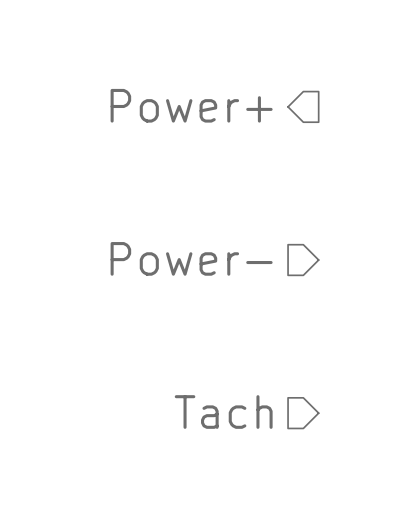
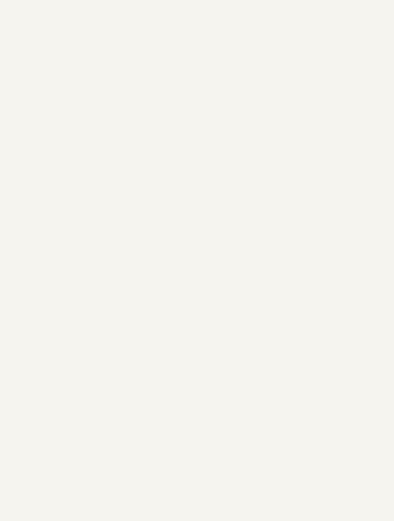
hierarchical label: Power+ (191, 105) -> none
hierarchical label: Power- (191, 258) -> none
hierarchical label: Tach (223, 412) -> none

